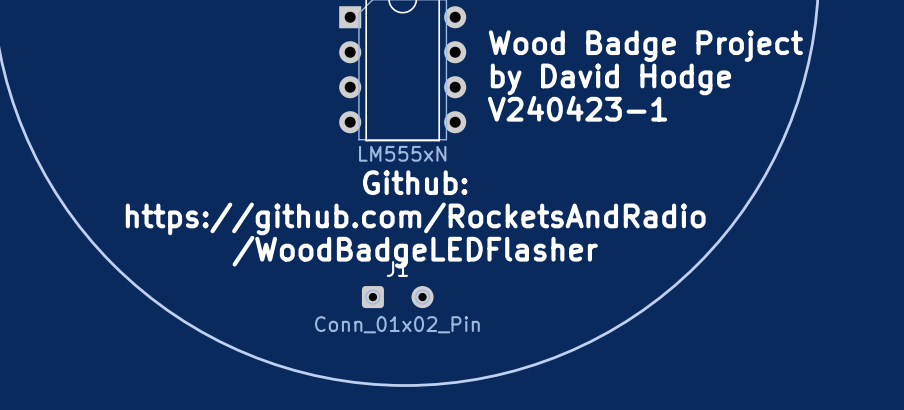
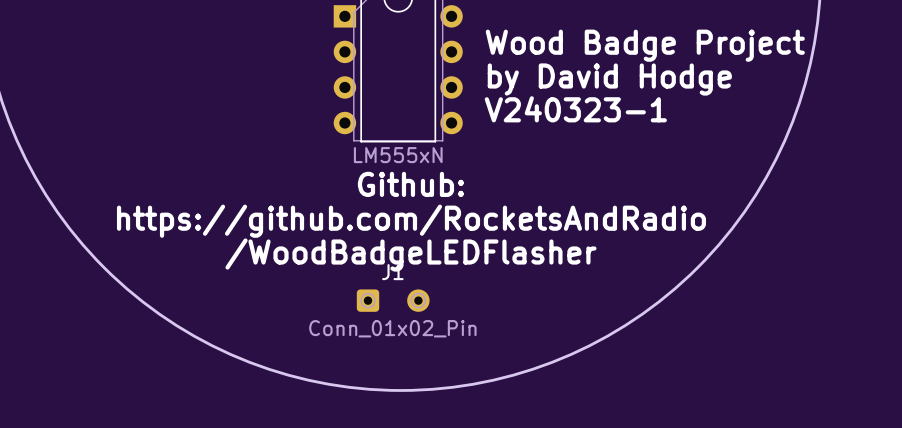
text: V240423-1 (577, 108) -> V240323-1 (575, 109)

